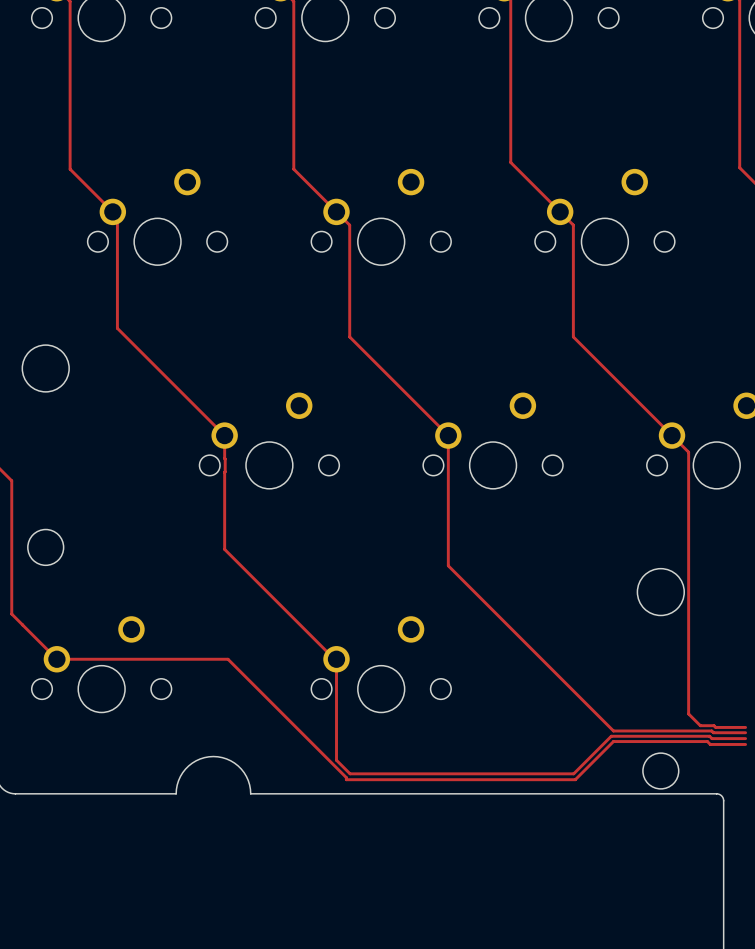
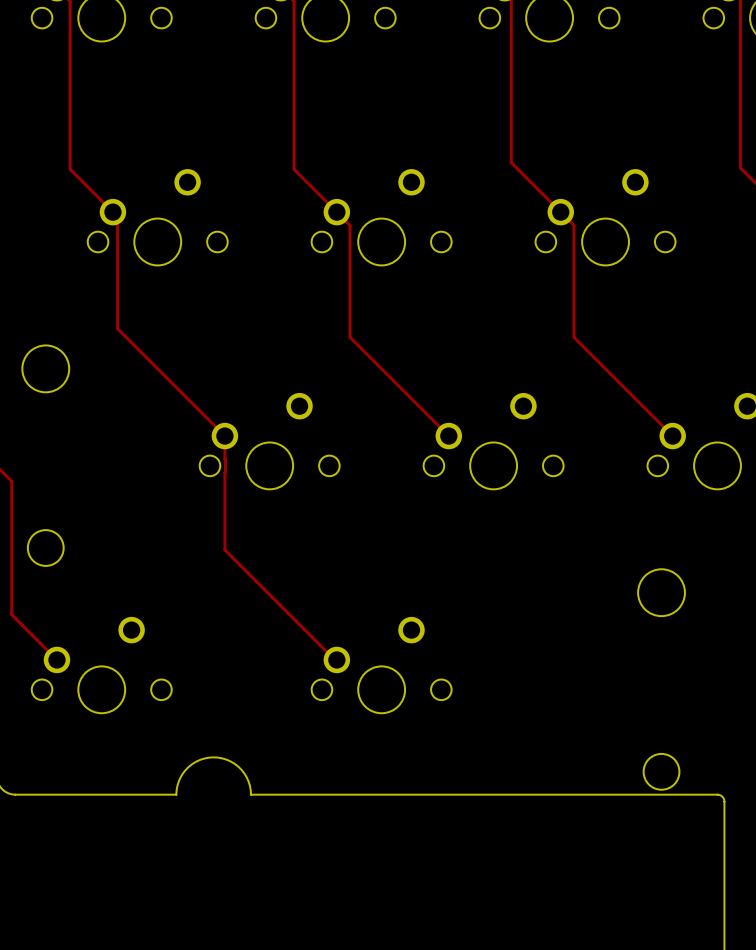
track: (448, 435) (448, 565) (613, 730) (745, 732) -> none
track: (672, 435) (688, 452) (688, 713) (700, 725) (745, 727) -> none
track: (56, 659) (228, 659) (346, 779) (575, 779) (613, 741) (707, 741) (710, 744) (745, 744) -> none
track: (336, 659) (336, 760) (350, 773) (573, 773) (611, 736) (709, 736) (711, 738) (745, 738) -> none

